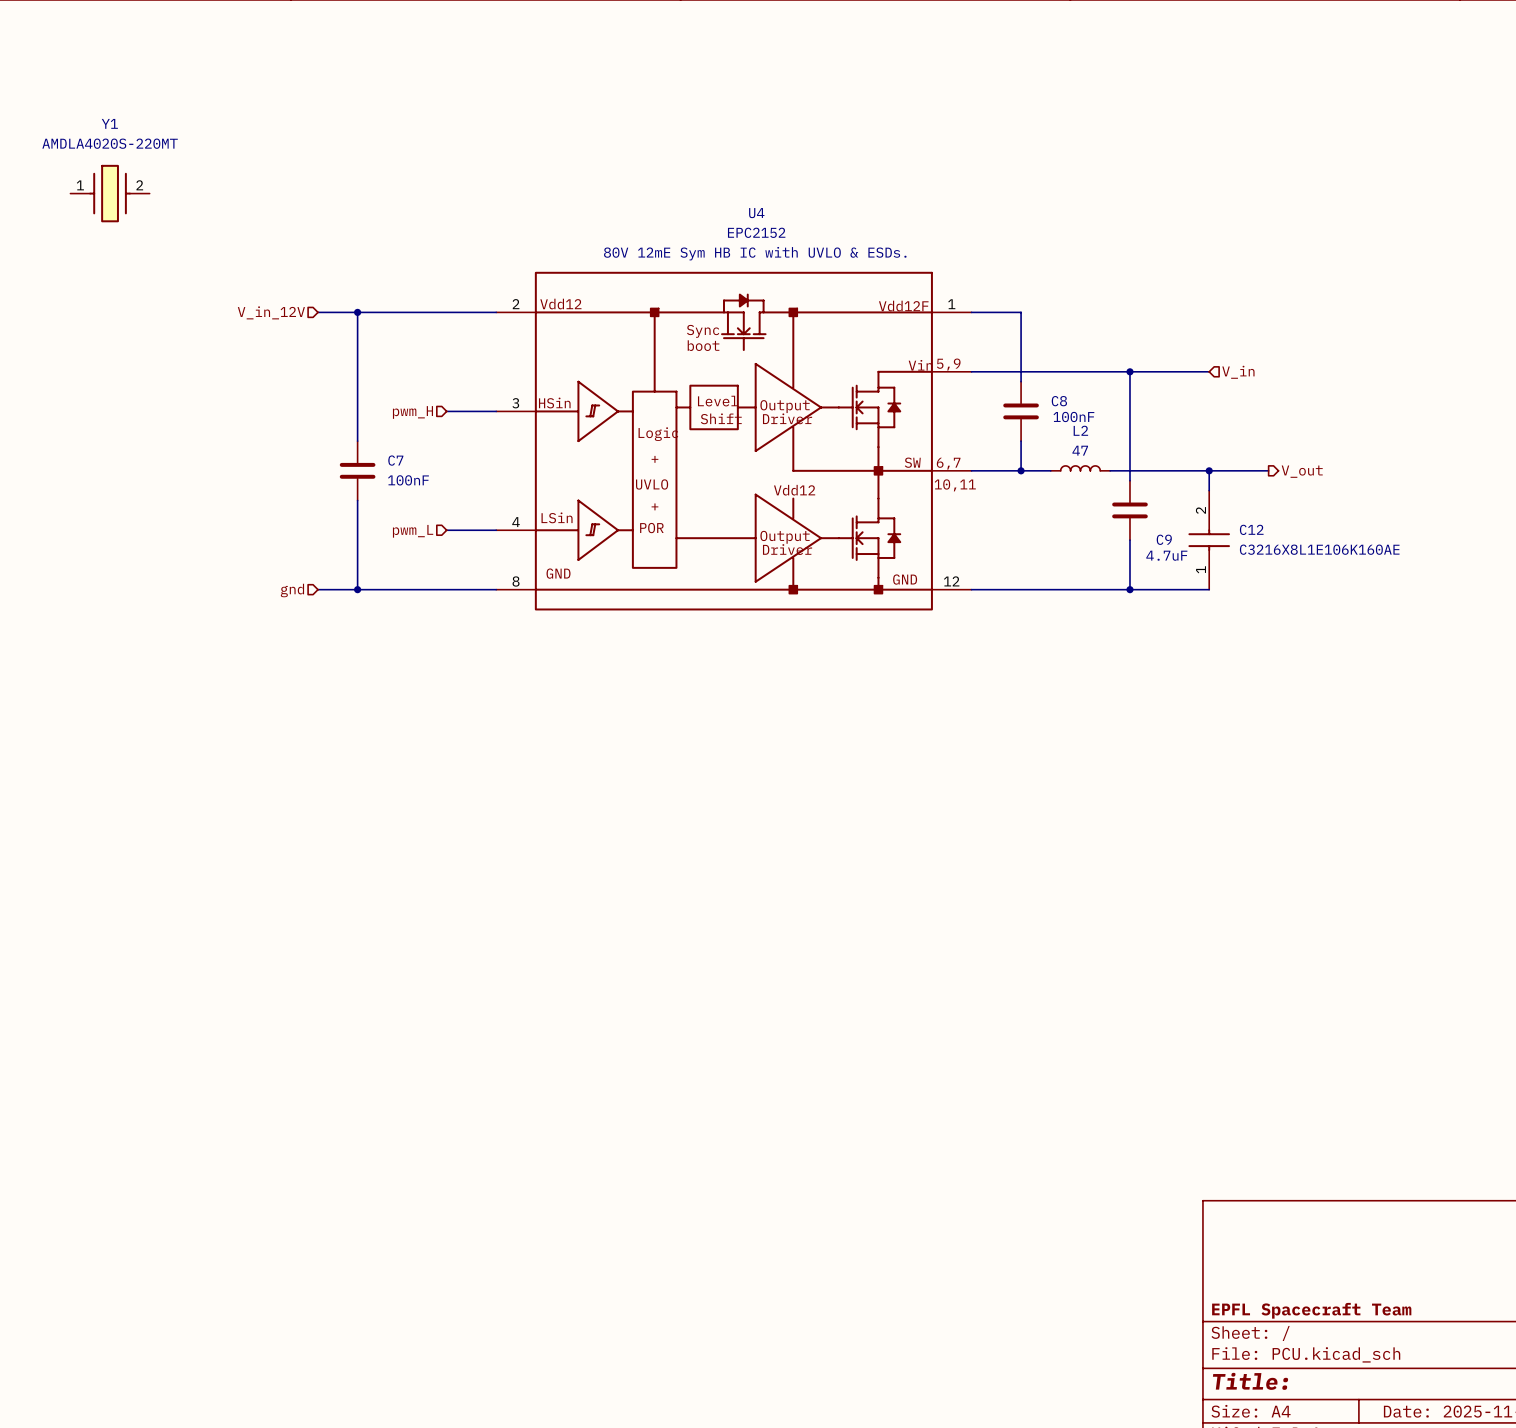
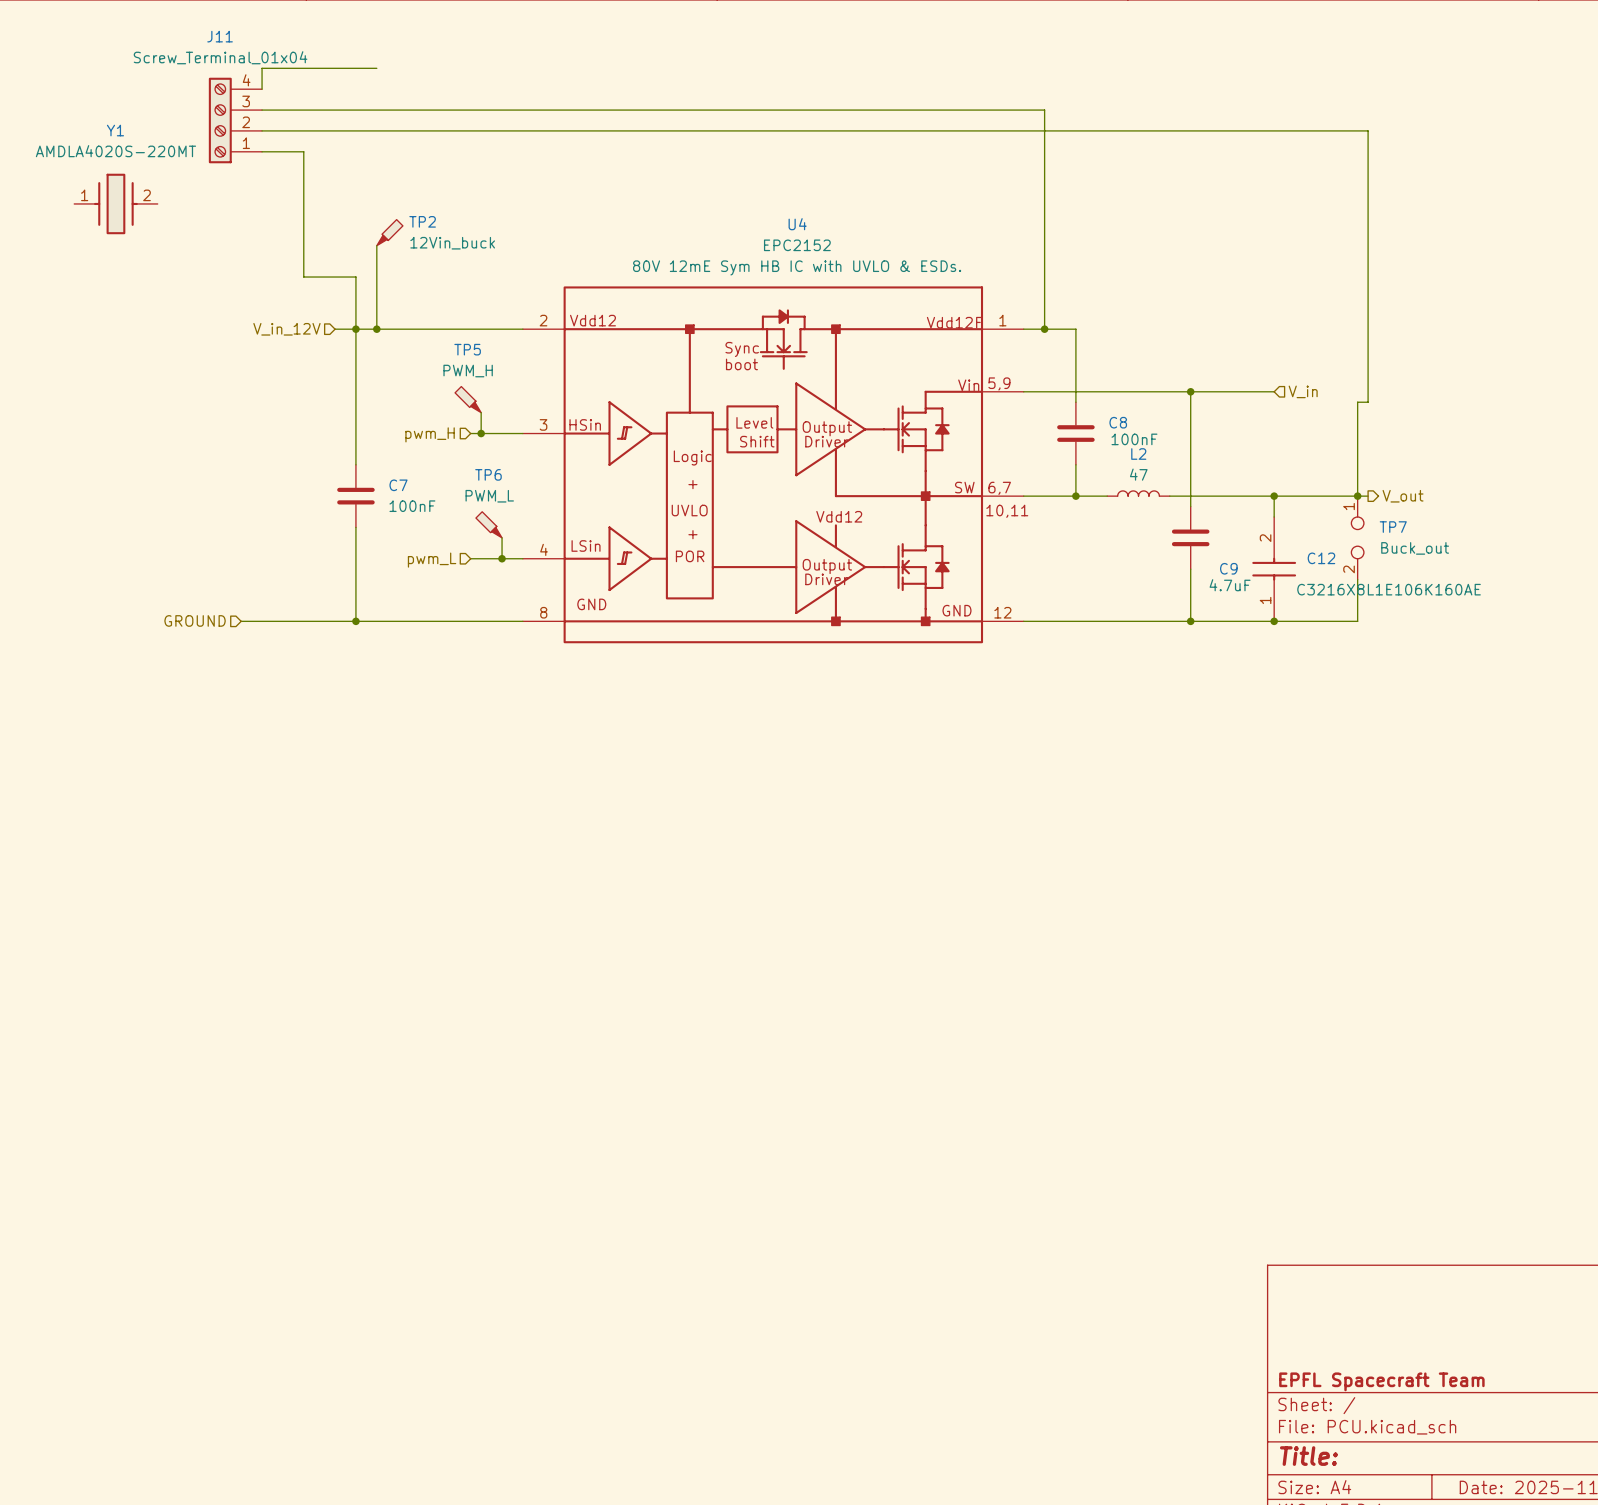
wire: none -> (376, 68) (262, 68) (262, 89)
wire: none -> (262, 110) (1044, 110) (1044, 329)
J11: none -> Screw_Terminal_01x04 (235, 120)
wire: none -> (262, 130) (1368, 130) (1368, 402) (1357, 402) (1357, 496)
wire: none -> (262, 151) (303, 151) (303, 277) (355, 277) (355, 464)
TP2: none -> 12Vin_buck (389, 232)
junction: none -> (355, 329)
wire: (357, 312) (357, 441) -> (376, 329) (376, 245)
junction: none -> (1044, 329)
TP5: none -> PWM_H (468, 399)
wire: none -> (481, 412) (481, 433)
junction: none -> (481, 433)
C7 position: (357, 470) -> (355, 496)
wire: none -> (1336, 496) (1368, 496)
junction: none -> (1357, 496)
hierarchical label position: V_out (1302, 471) -> V_out (1403, 496)
TP6: none -> PWM_L (488, 524)
wire: (357, 500) (357, 589) -> (355, 527) (355, 621)
wire: none -> (502, 537) (502, 558)
TP7: none -> Buck_out (1357, 537)
junction: none -> (502, 558)
C12 value position: C3216X8L1E106K160AE (1319, 549) -> C3216X8L1E106K160AE (1389, 589)
wire: none -> (1357, 579) (1357, 621) (1274, 621)
hierarchical label: none -> GROUND (195, 620)
wire: none -> (241, 621) (335, 621)
junction position: (357, 589) -> (355, 621)
junction: none -> (1274, 621)
hierarchical label: gnd (292, 590) -> none

